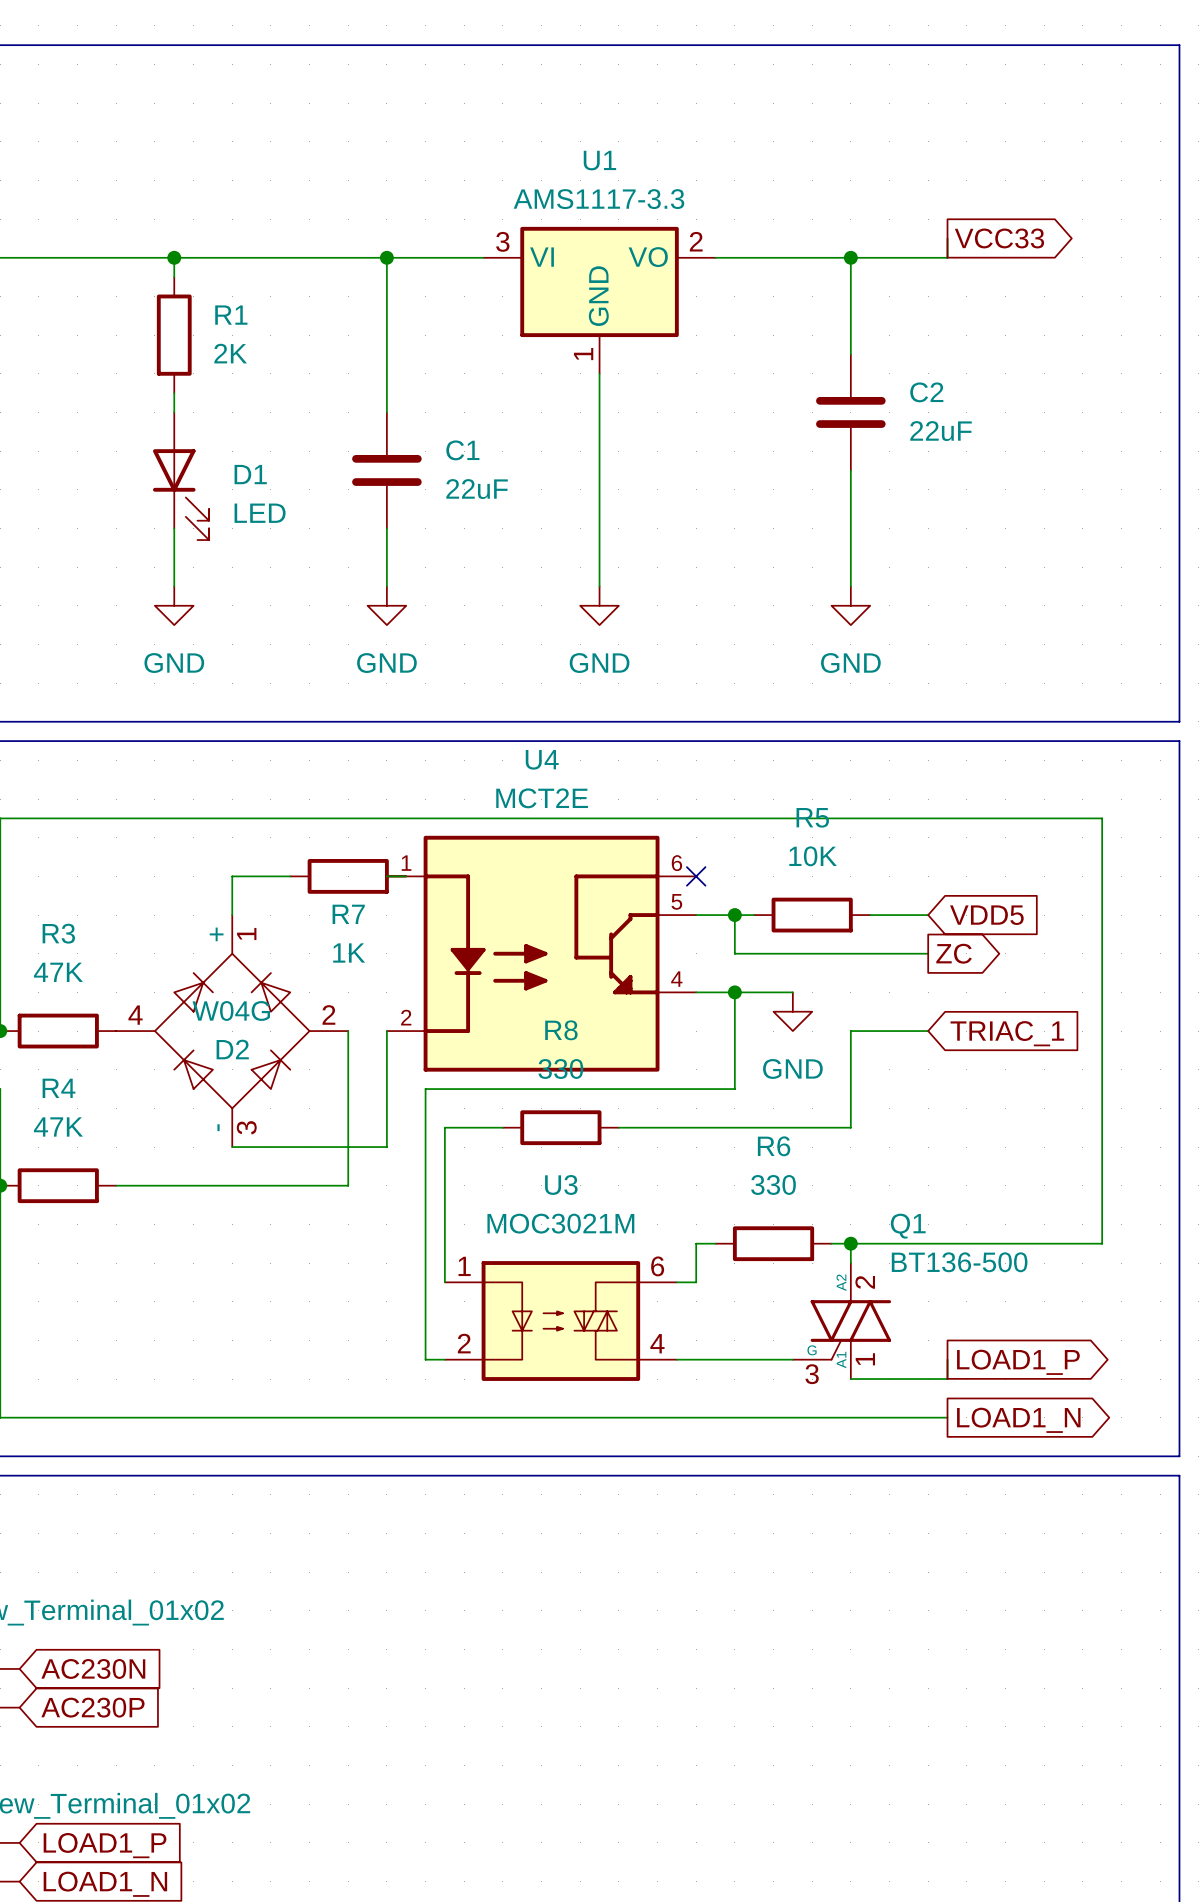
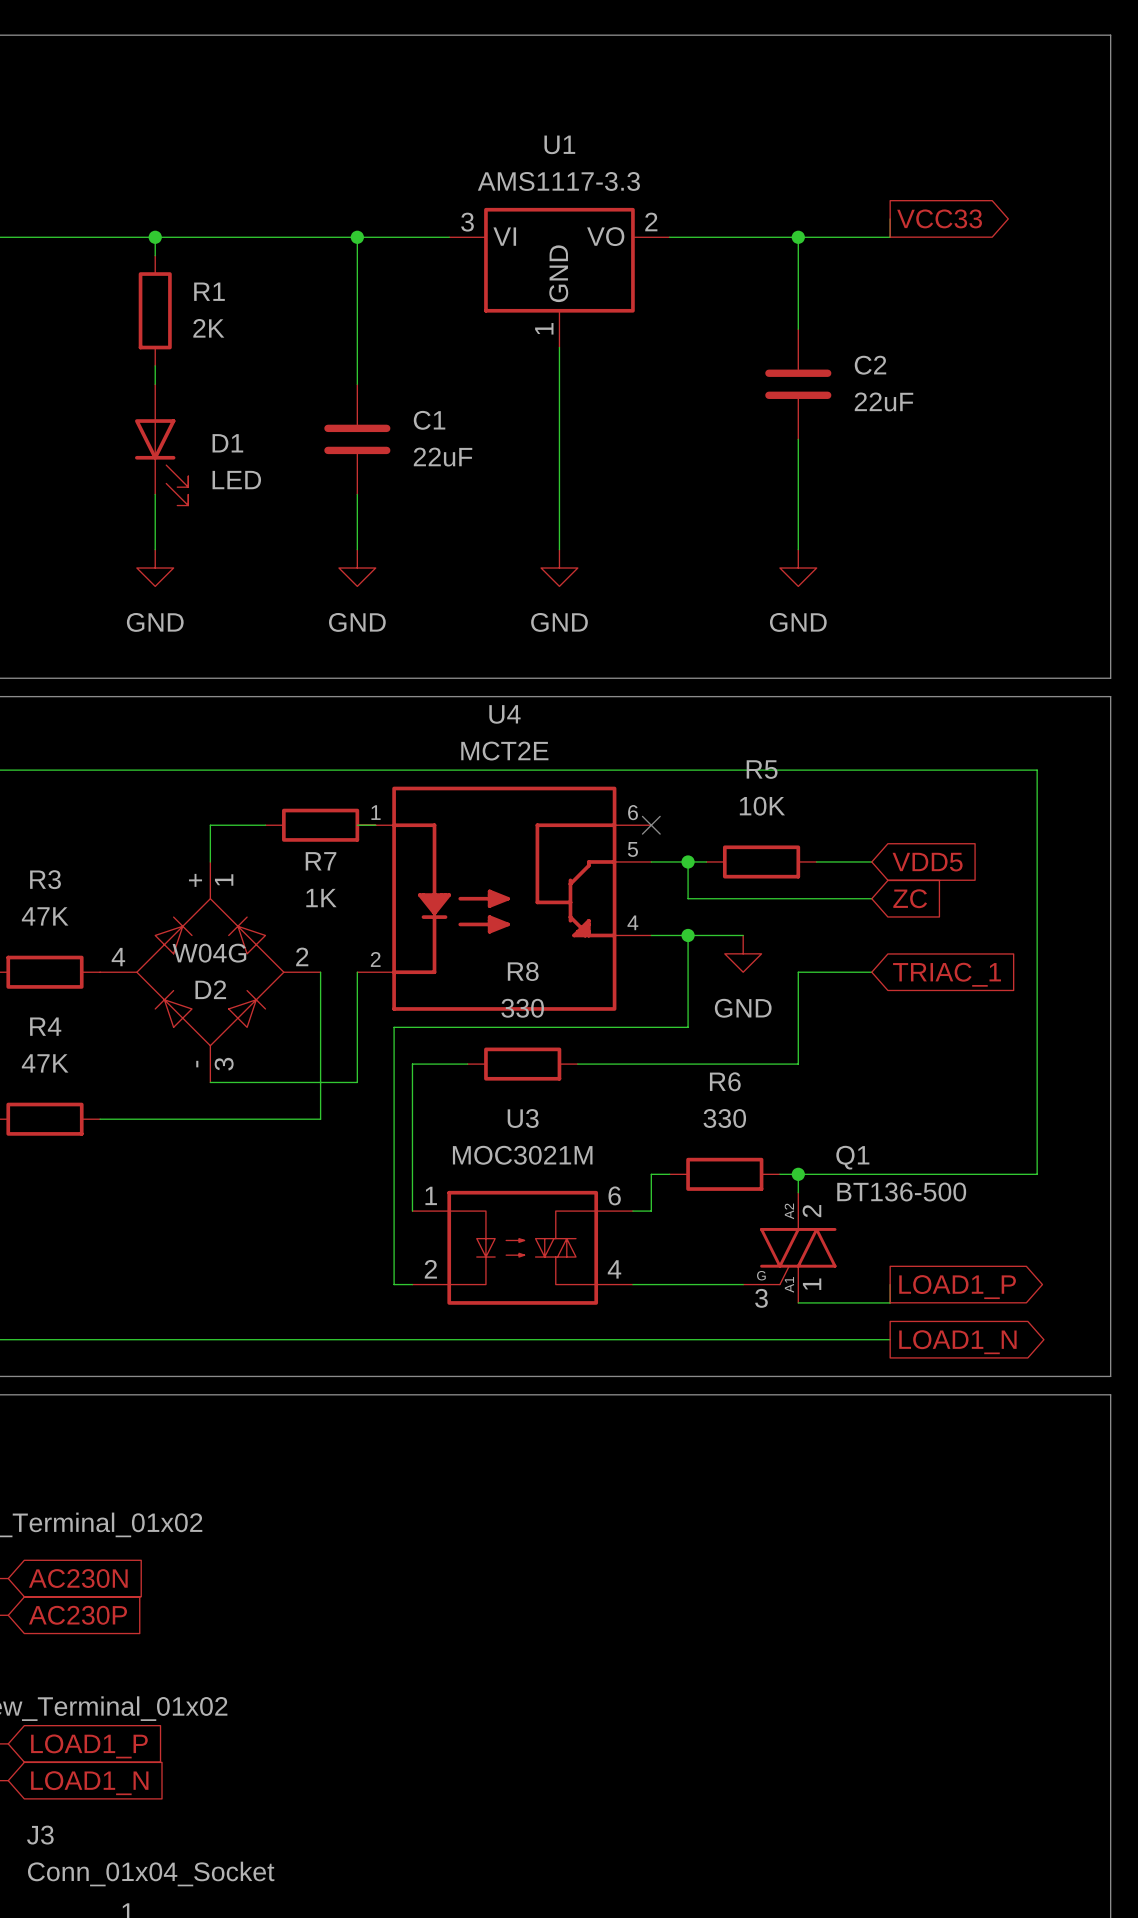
global label shape: output (954, 953) -> input (910, 898)

